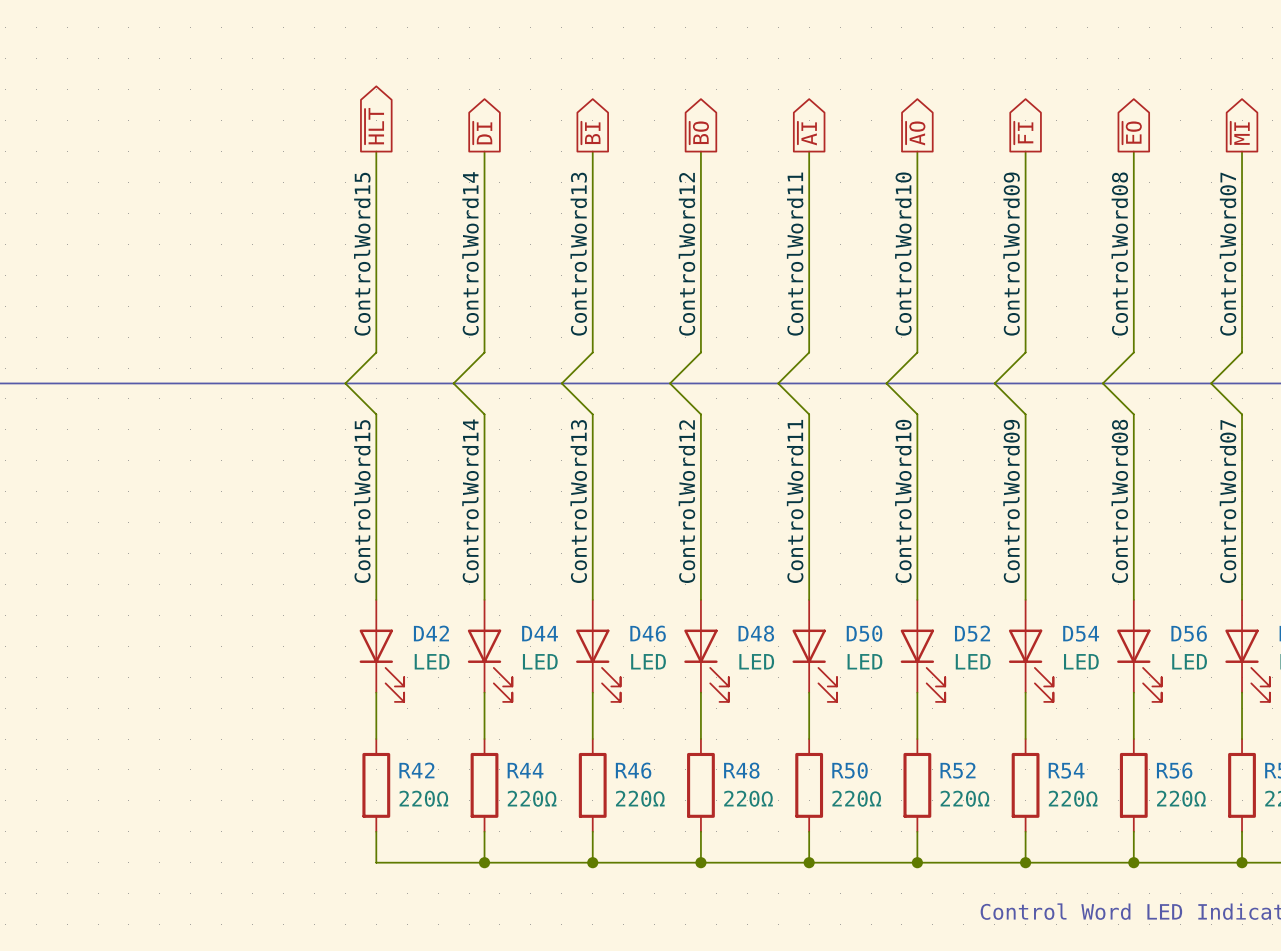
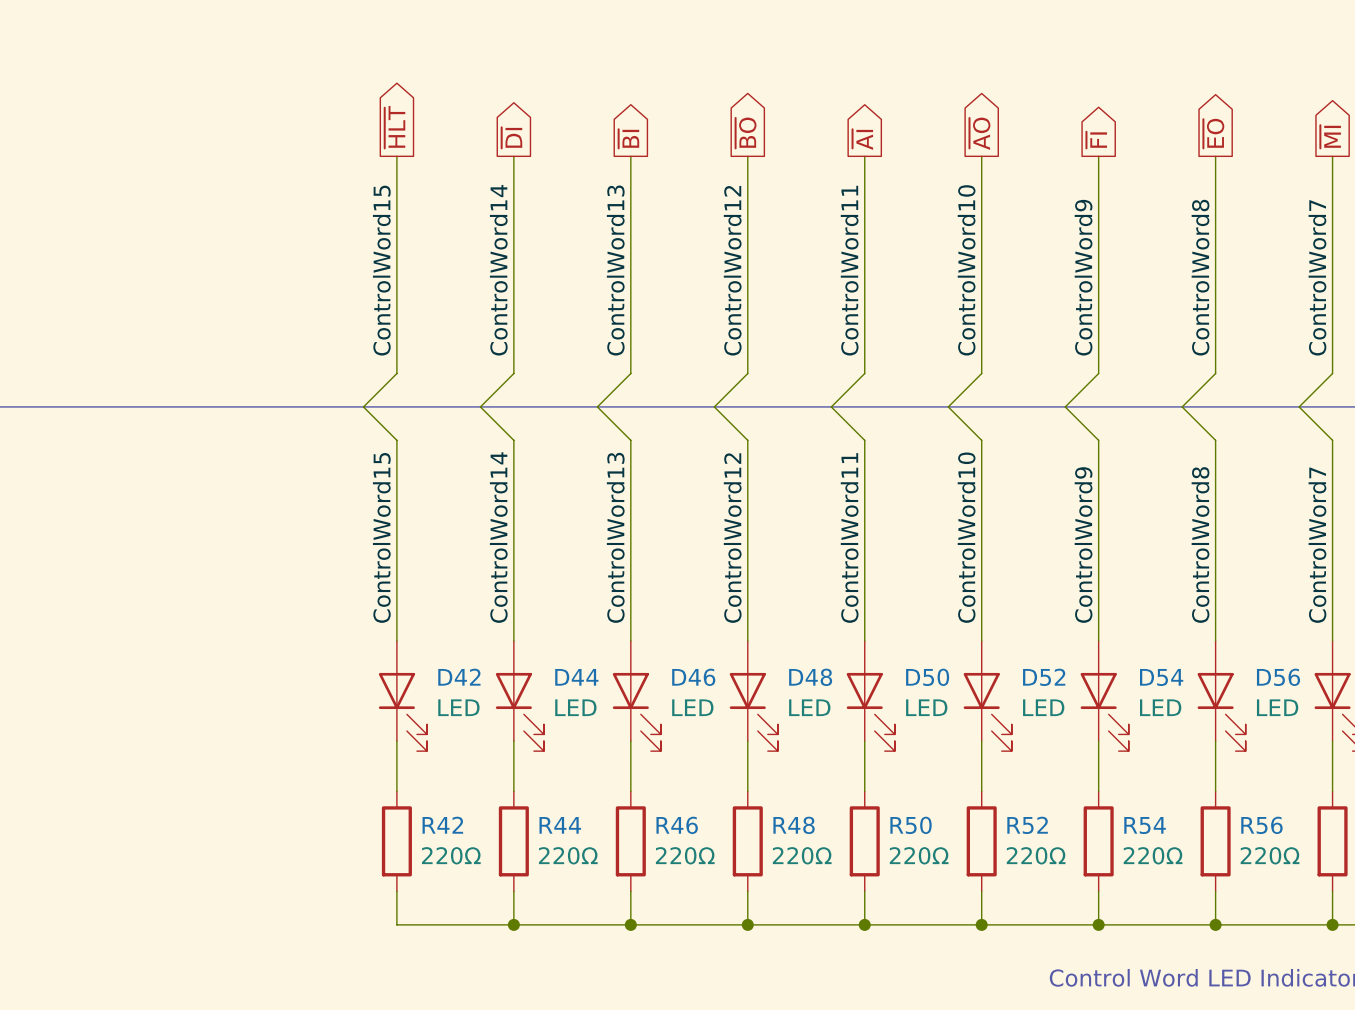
label: ControlWord09 (1011, 254) -> ControlWord9 (1083, 277)
label: ControlWord08 (1119, 254) -> ControlWord8 (1200, 277)
label: ControlWord07 (1227, 254) -> ControlWord7 (1317, 277)
label: ControlWord09 (1011, 501) -> ControlWord9 (1083, 545)
label: ControlWord08 (1119, 501) -> ControlWord8 (1200, 545)
label: ControlWord07 (1227, 501) -> ControlWord7 (1317, 545)

